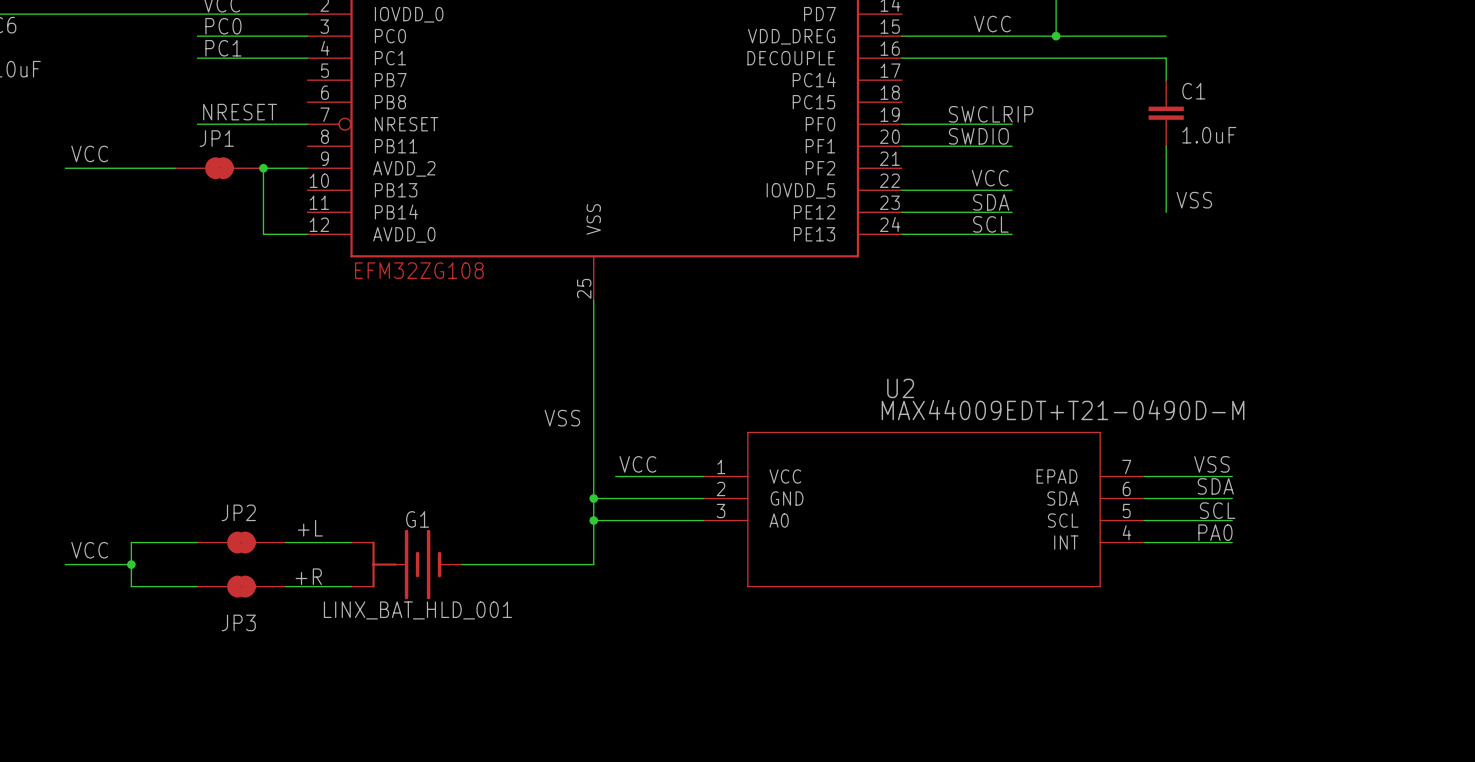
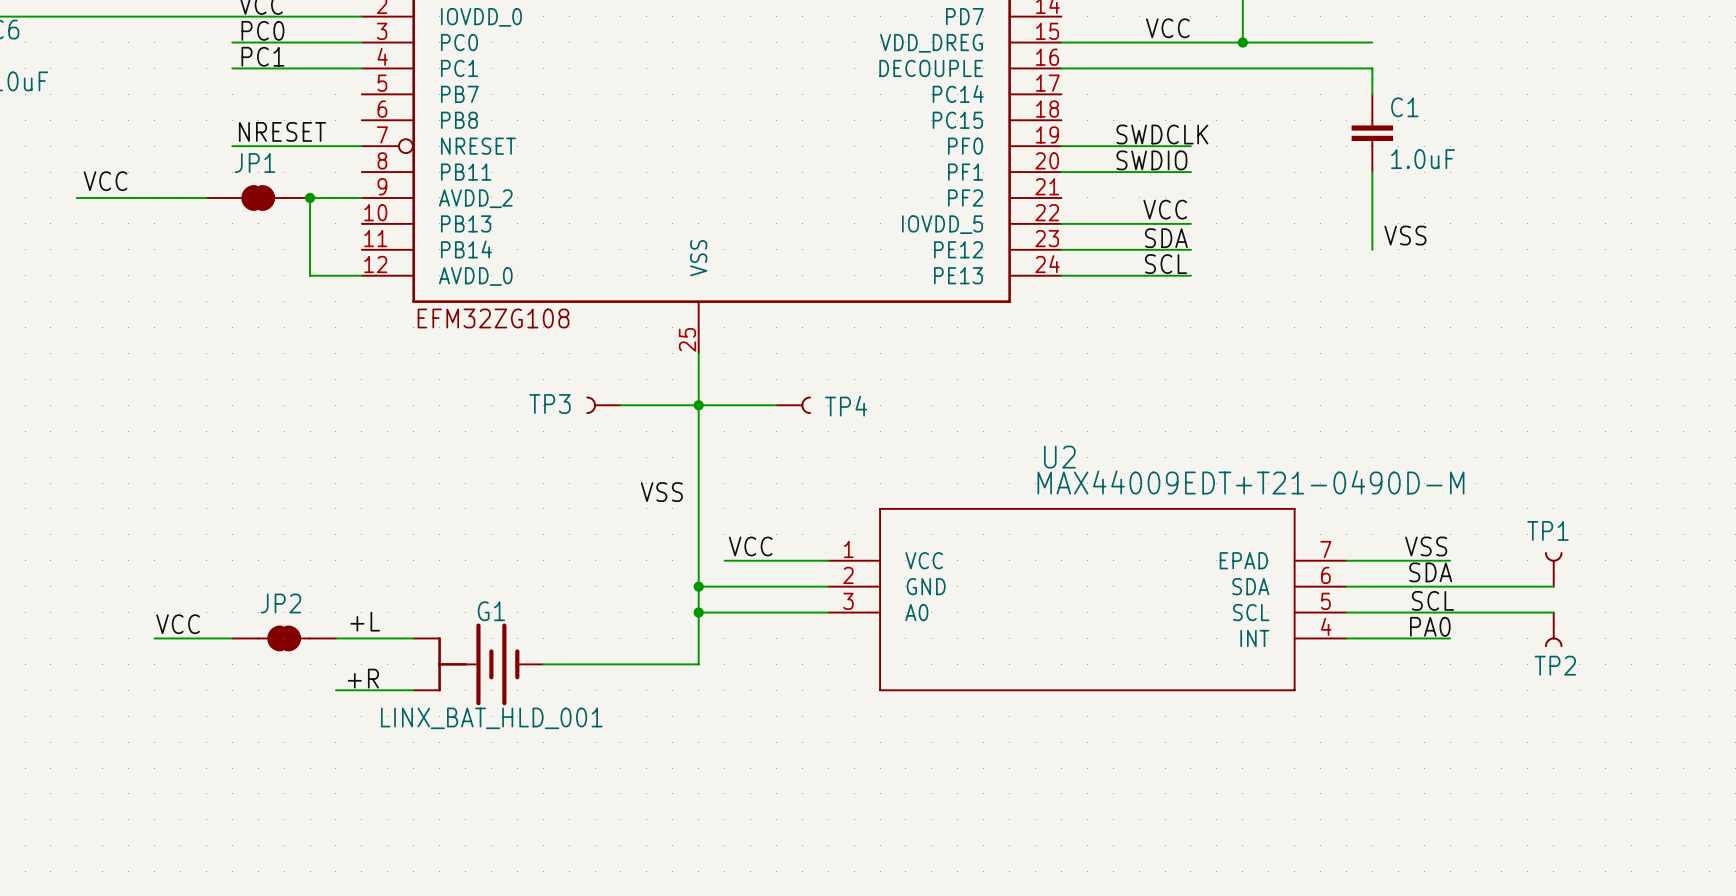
label: SWCLRIP (991, 114) -> SWDCLK (1162, 134)
TP3: none -> (604, 405)
wire: none -> (620, 405) (776, 405)
junction: none -> (698, 405)
TP4: none -> (793, 405)
TP1: none -> (1553, 569)
wire: none -> (1450, 586) (1553, 586)
wire: none -> (1450, 612) (1553, 612)
TP2: none -> (1553, 629)
wire: (131, 542) (131, 586) (197, 586) -> none
label position: VCC (89, 550) -> VCC (178, 624)
wire: (65, 564) (131, 564) -> none
junction: (131, 564) -> none
JP3: (241, 586) -> none

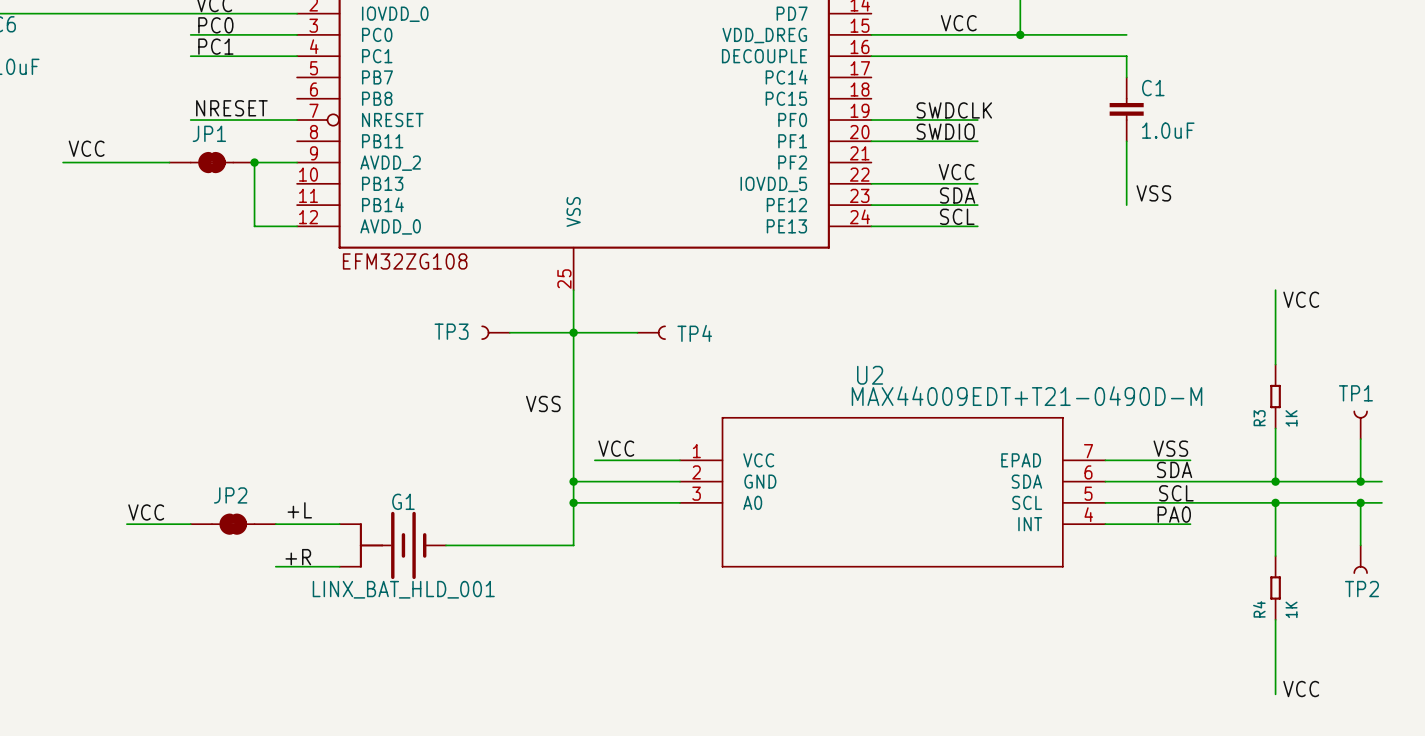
wire: none -> (1275, 290) (1275, 364)
label: none -> VCC (1301, 299)
R3: none -> 1K (1275, 396)
wire: none -> (1275, 428) (1275, 481) (1381, 481)
wire: none -> (1360, 439) (1360, 481)
TP1 position: (1553, 569) -> (1360, 425)
junction: none -> (1275, 481)
junction: none -> (1360, 481)
junction: none -> (1275, 502)
wire: none -> (1360, 502) (1360, 545)
junction: none -> (1360, 502)
wire: none -> (1381, 502) (1275, 502) (1275, 556)
TP2 position: (1553, 629) -> (1360, 559)
R4: none -> 1K (1275, 587)
wire: none -> (1275, 619) (1275, 694)
label: none -> VCC (1301, 689)

